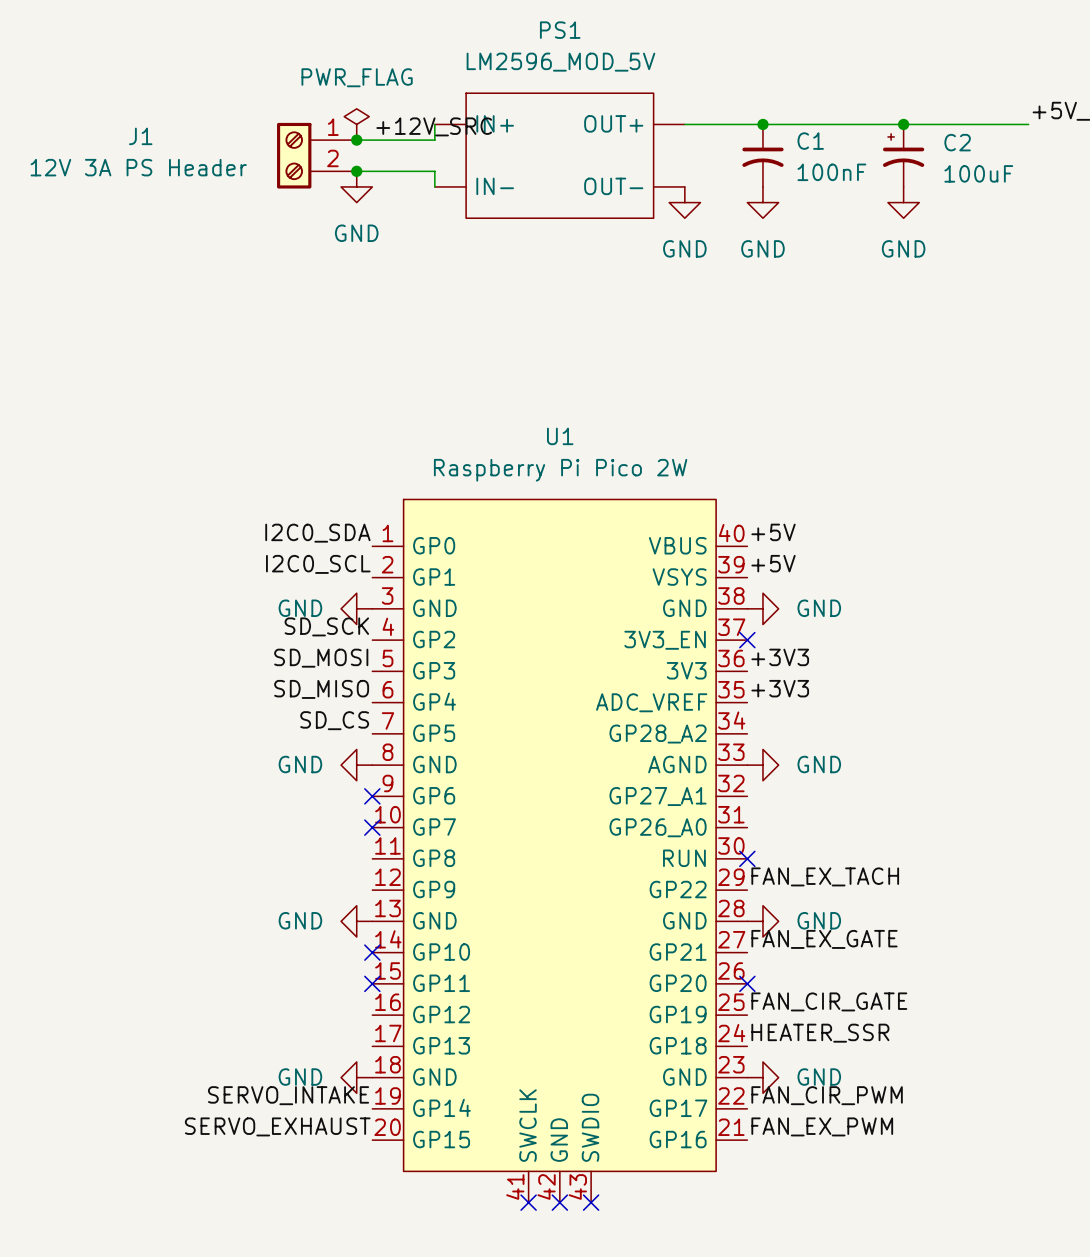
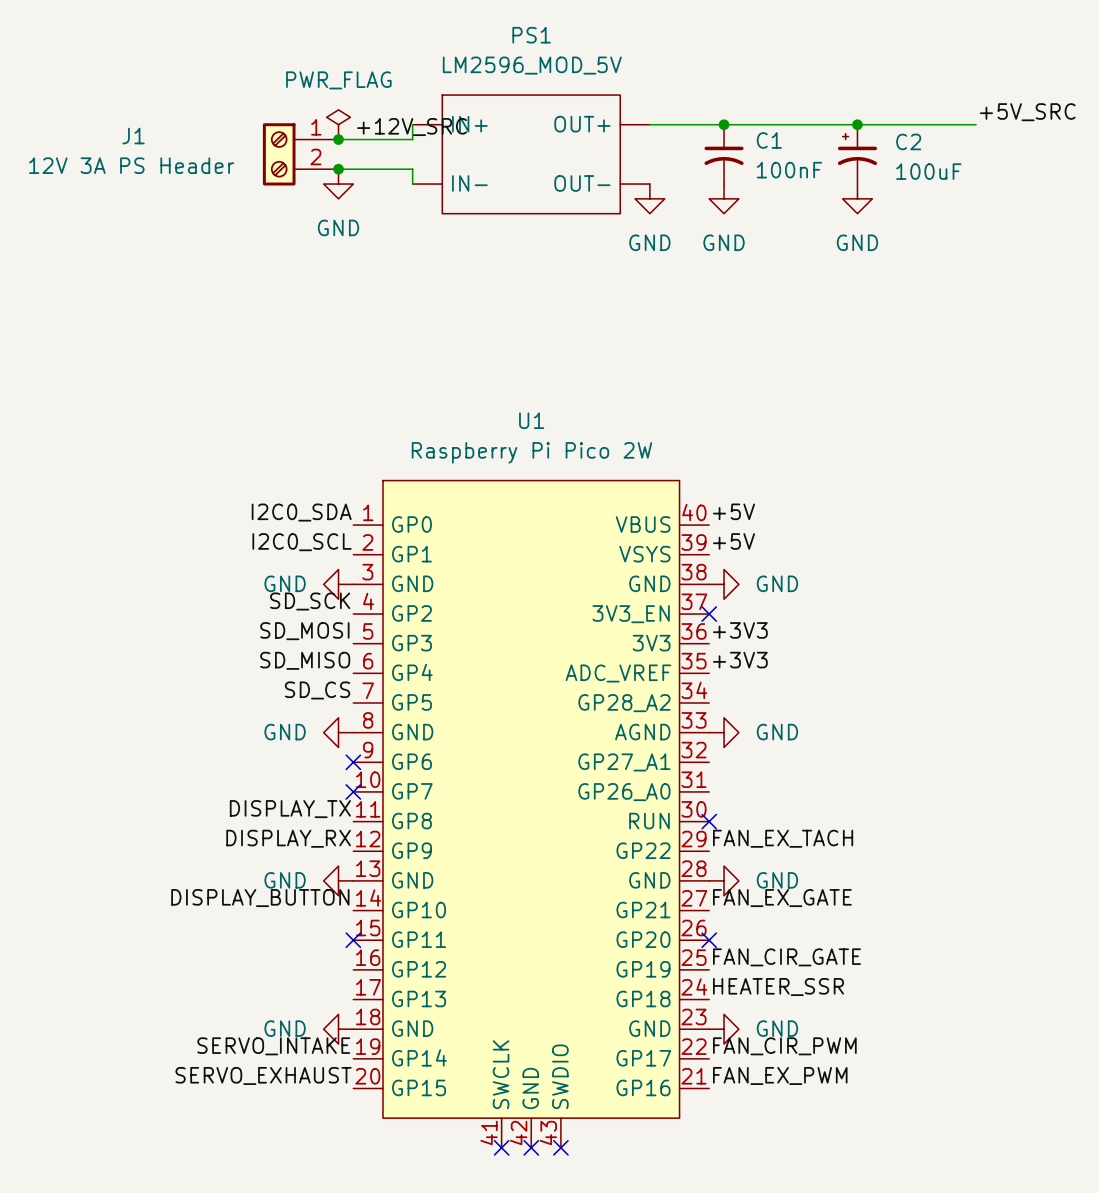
label: none -> DISPLAY_TX (290, 809)
label: none -> DISPLAY_RX (288, 838)
label: none -> DISPLAY_BUTTON (260, 898)
no-connect mark: (372, 952) -> none

